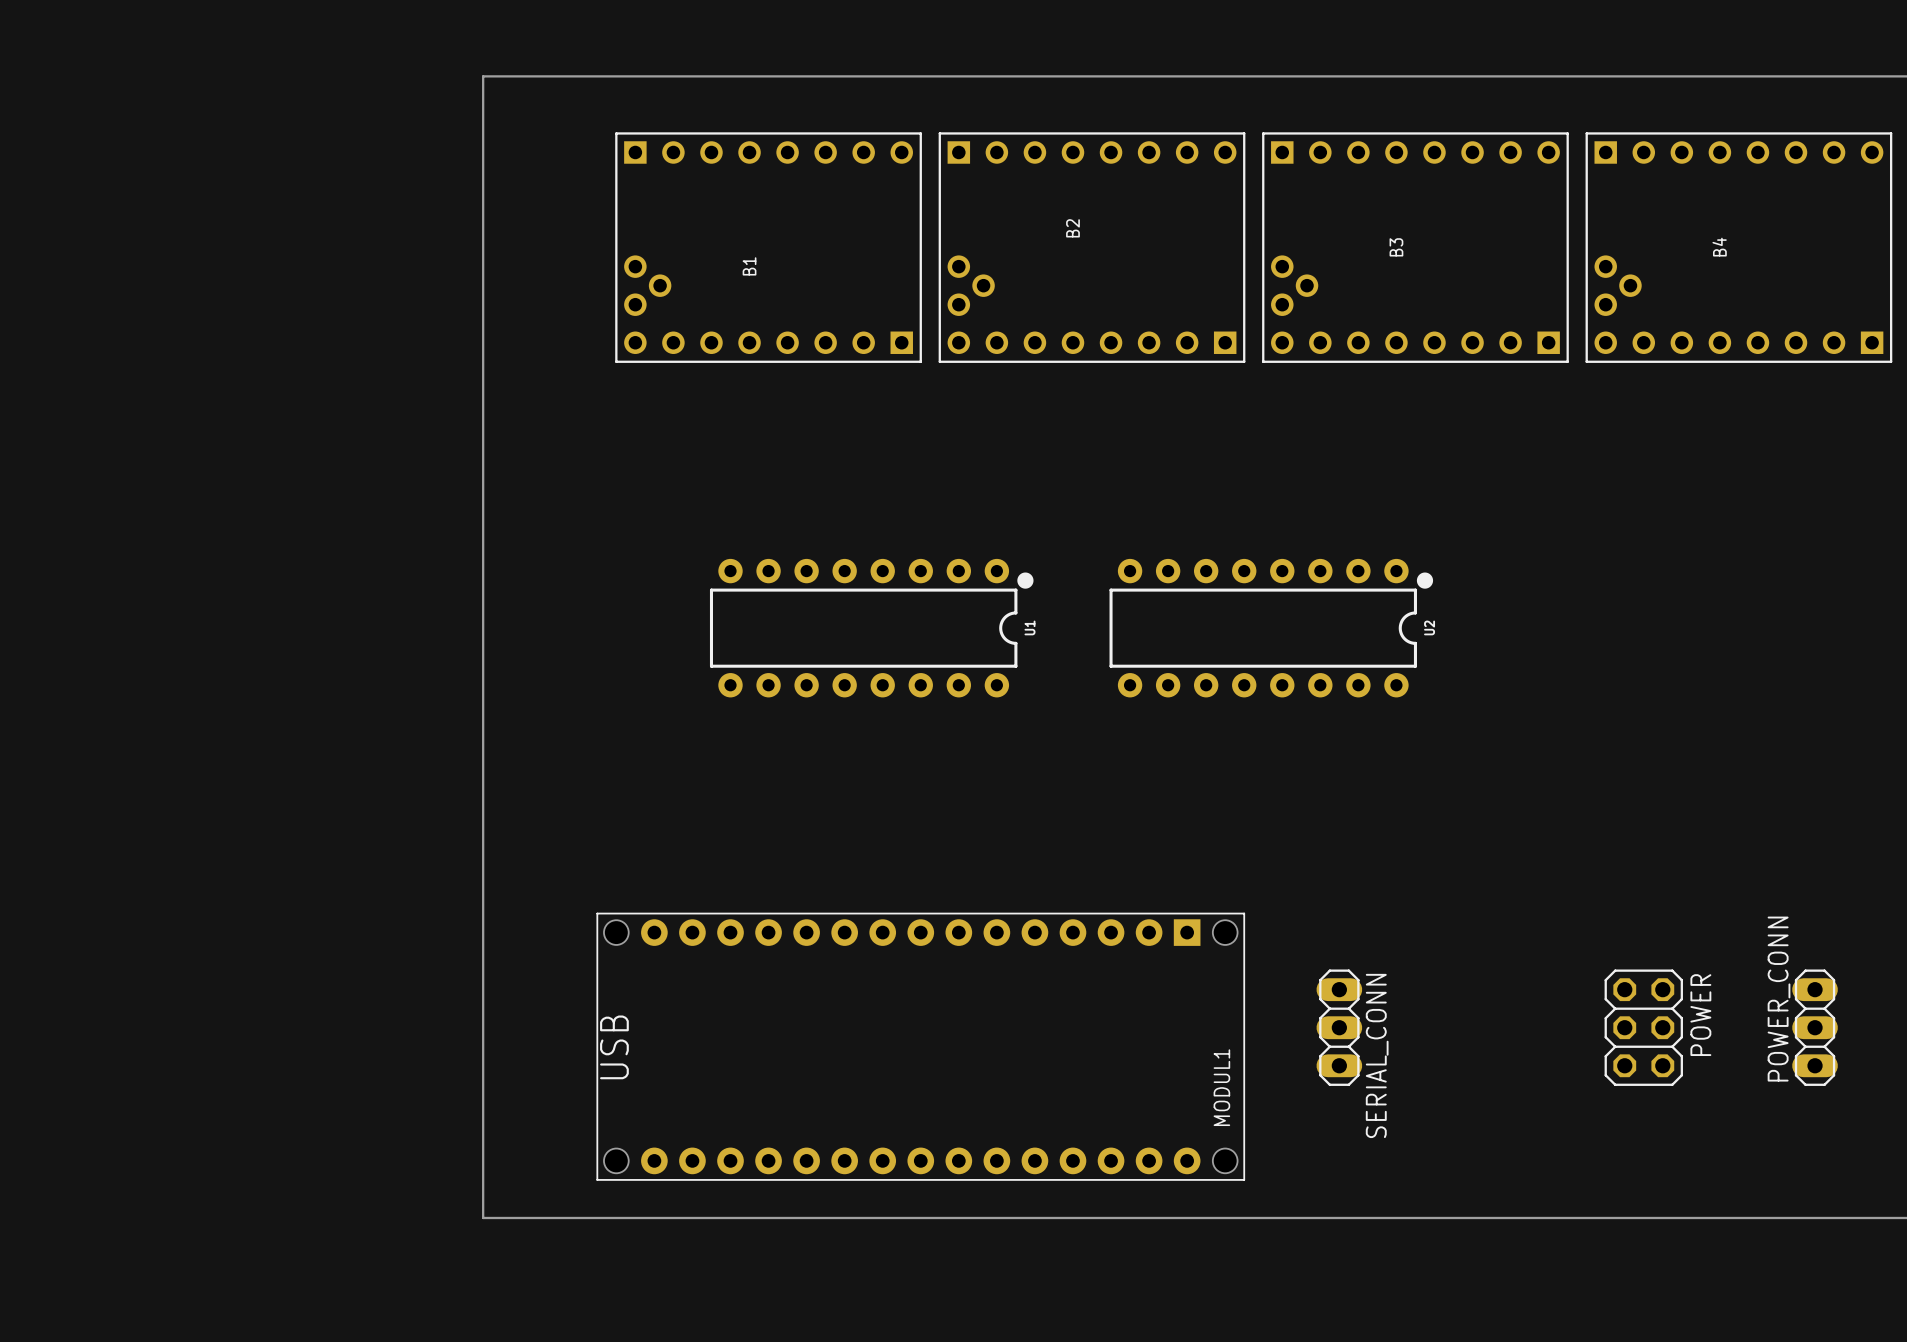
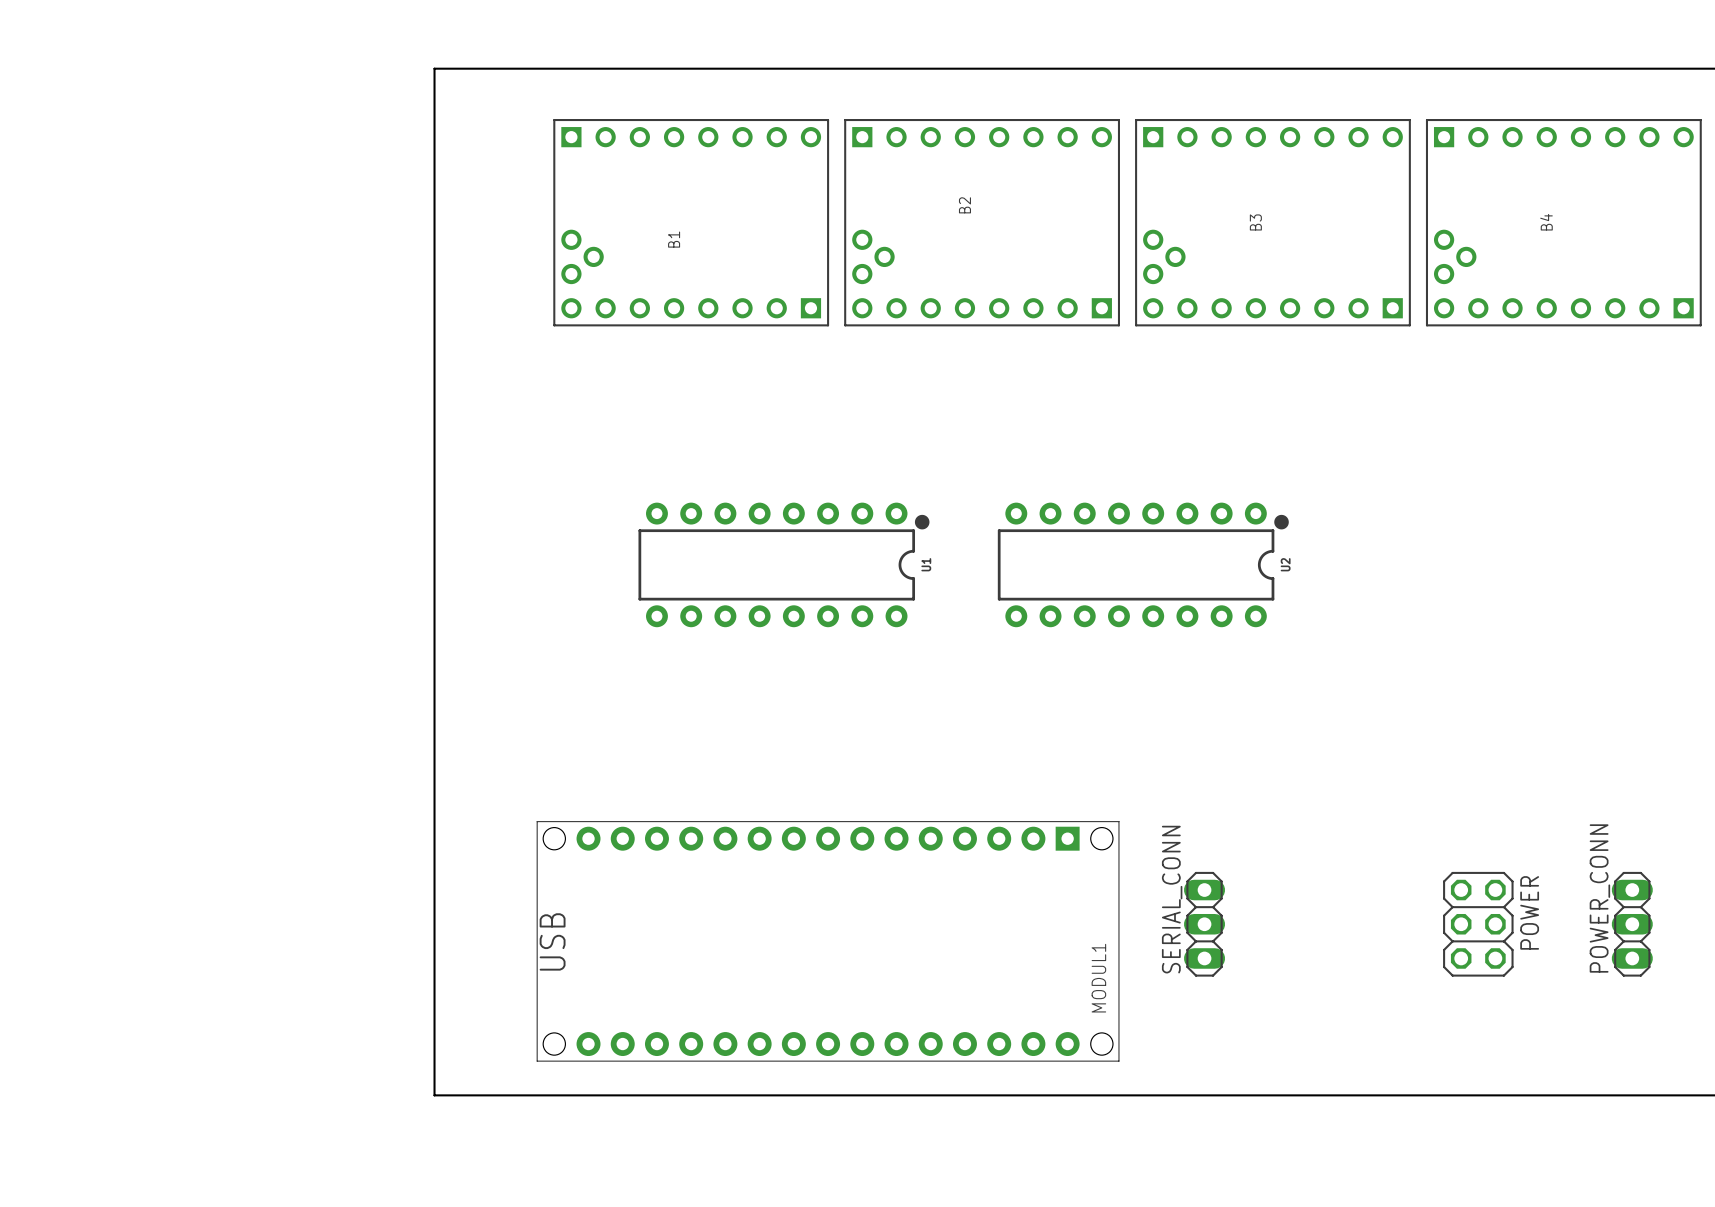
SERIAL_CONN name position: SERIAL_CONN (1377, 1055) -> SERIAL_CONN (1172, 899)

